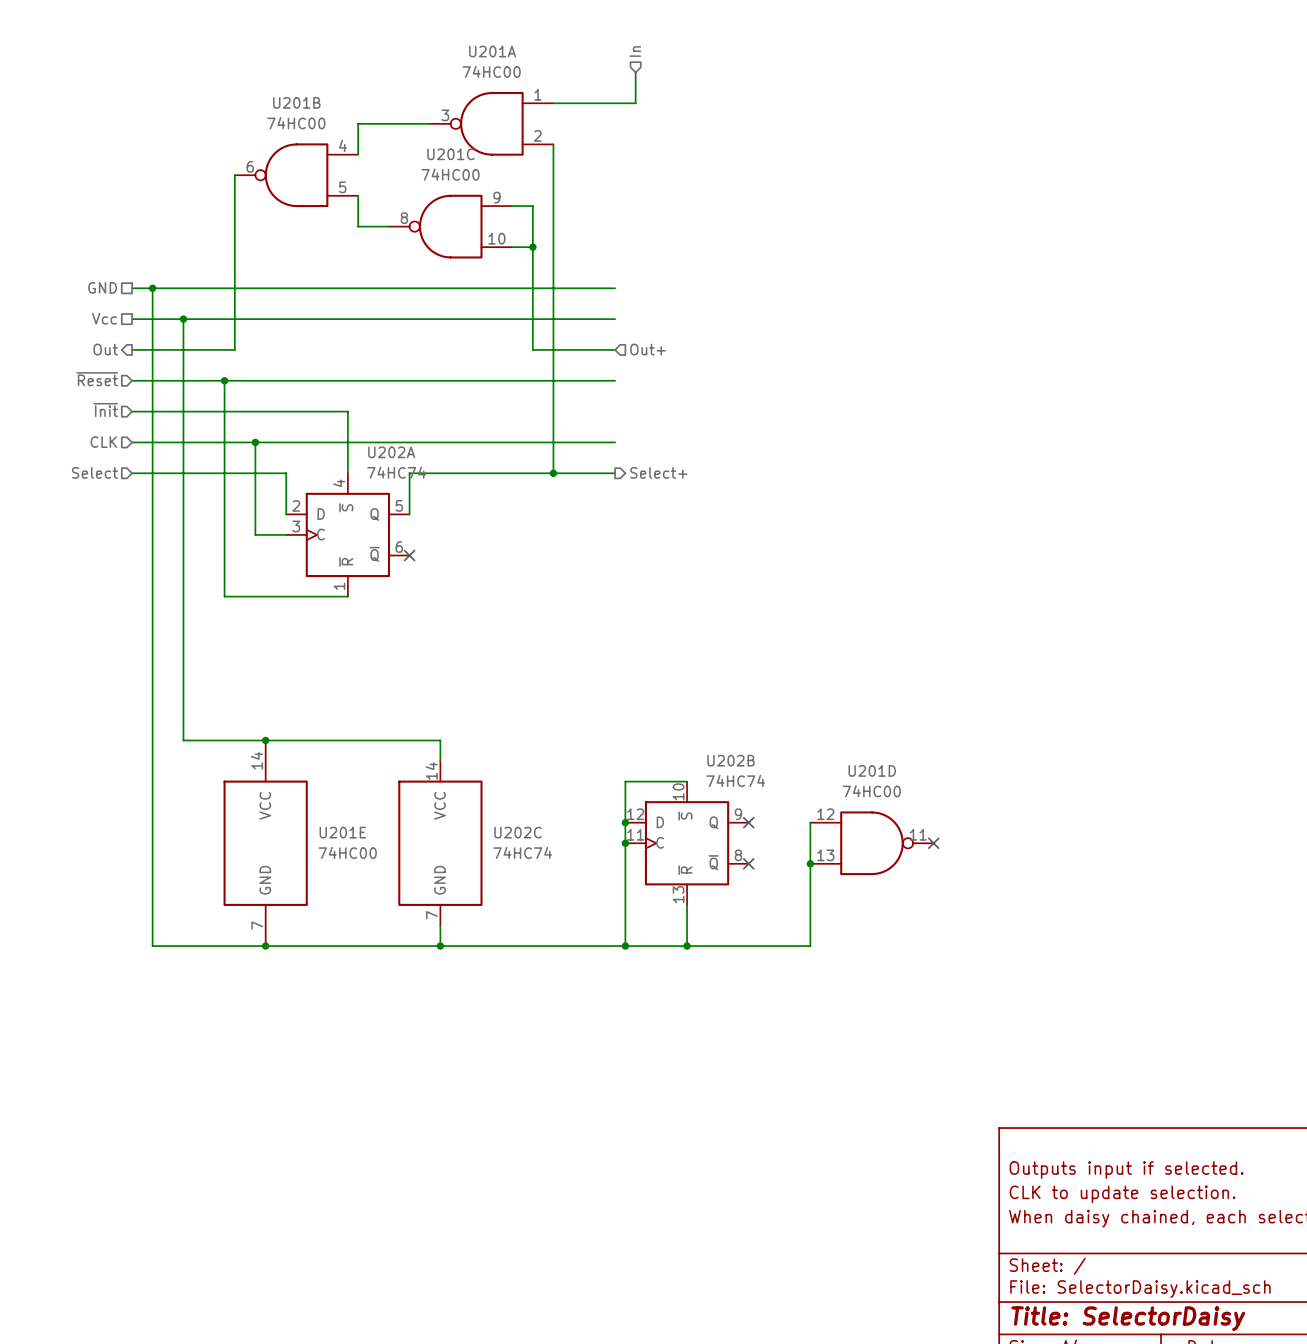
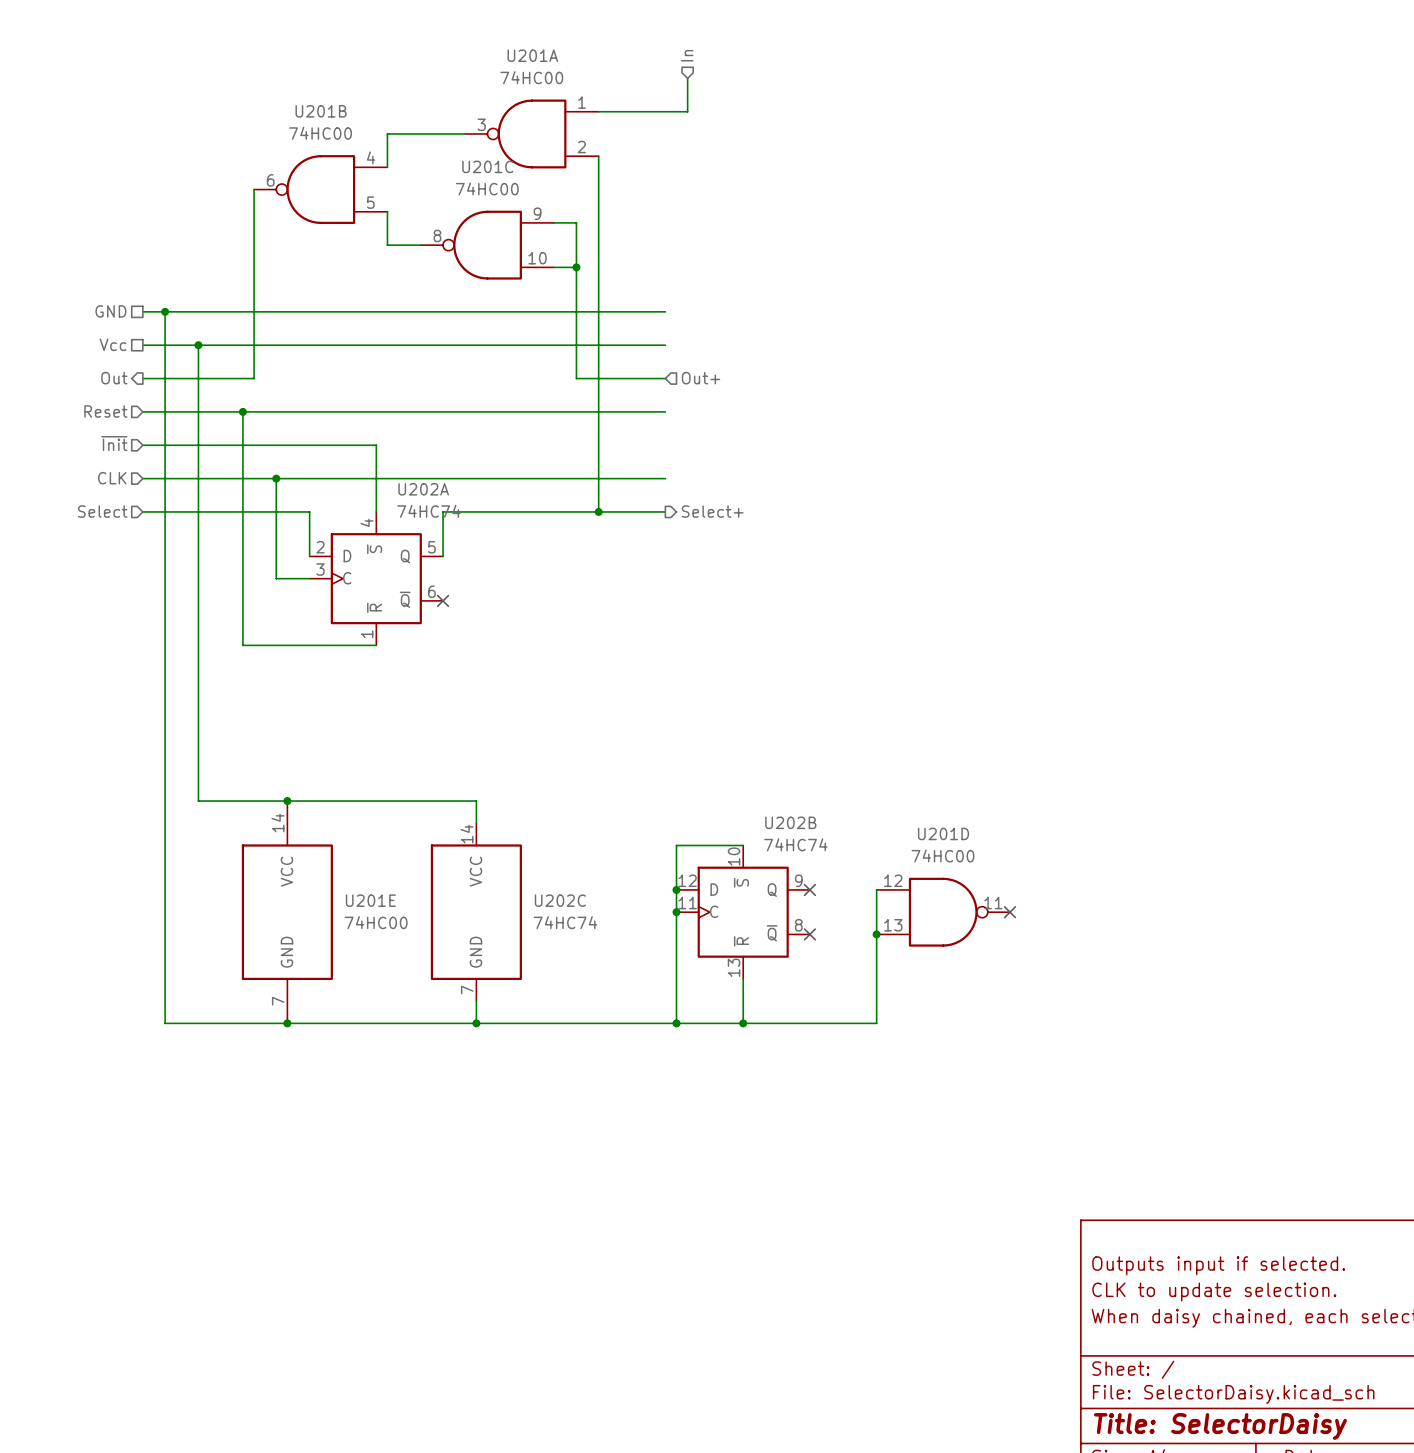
hierarchical label: ~{Reset} (97, 379) -> Reset (105, 411)

